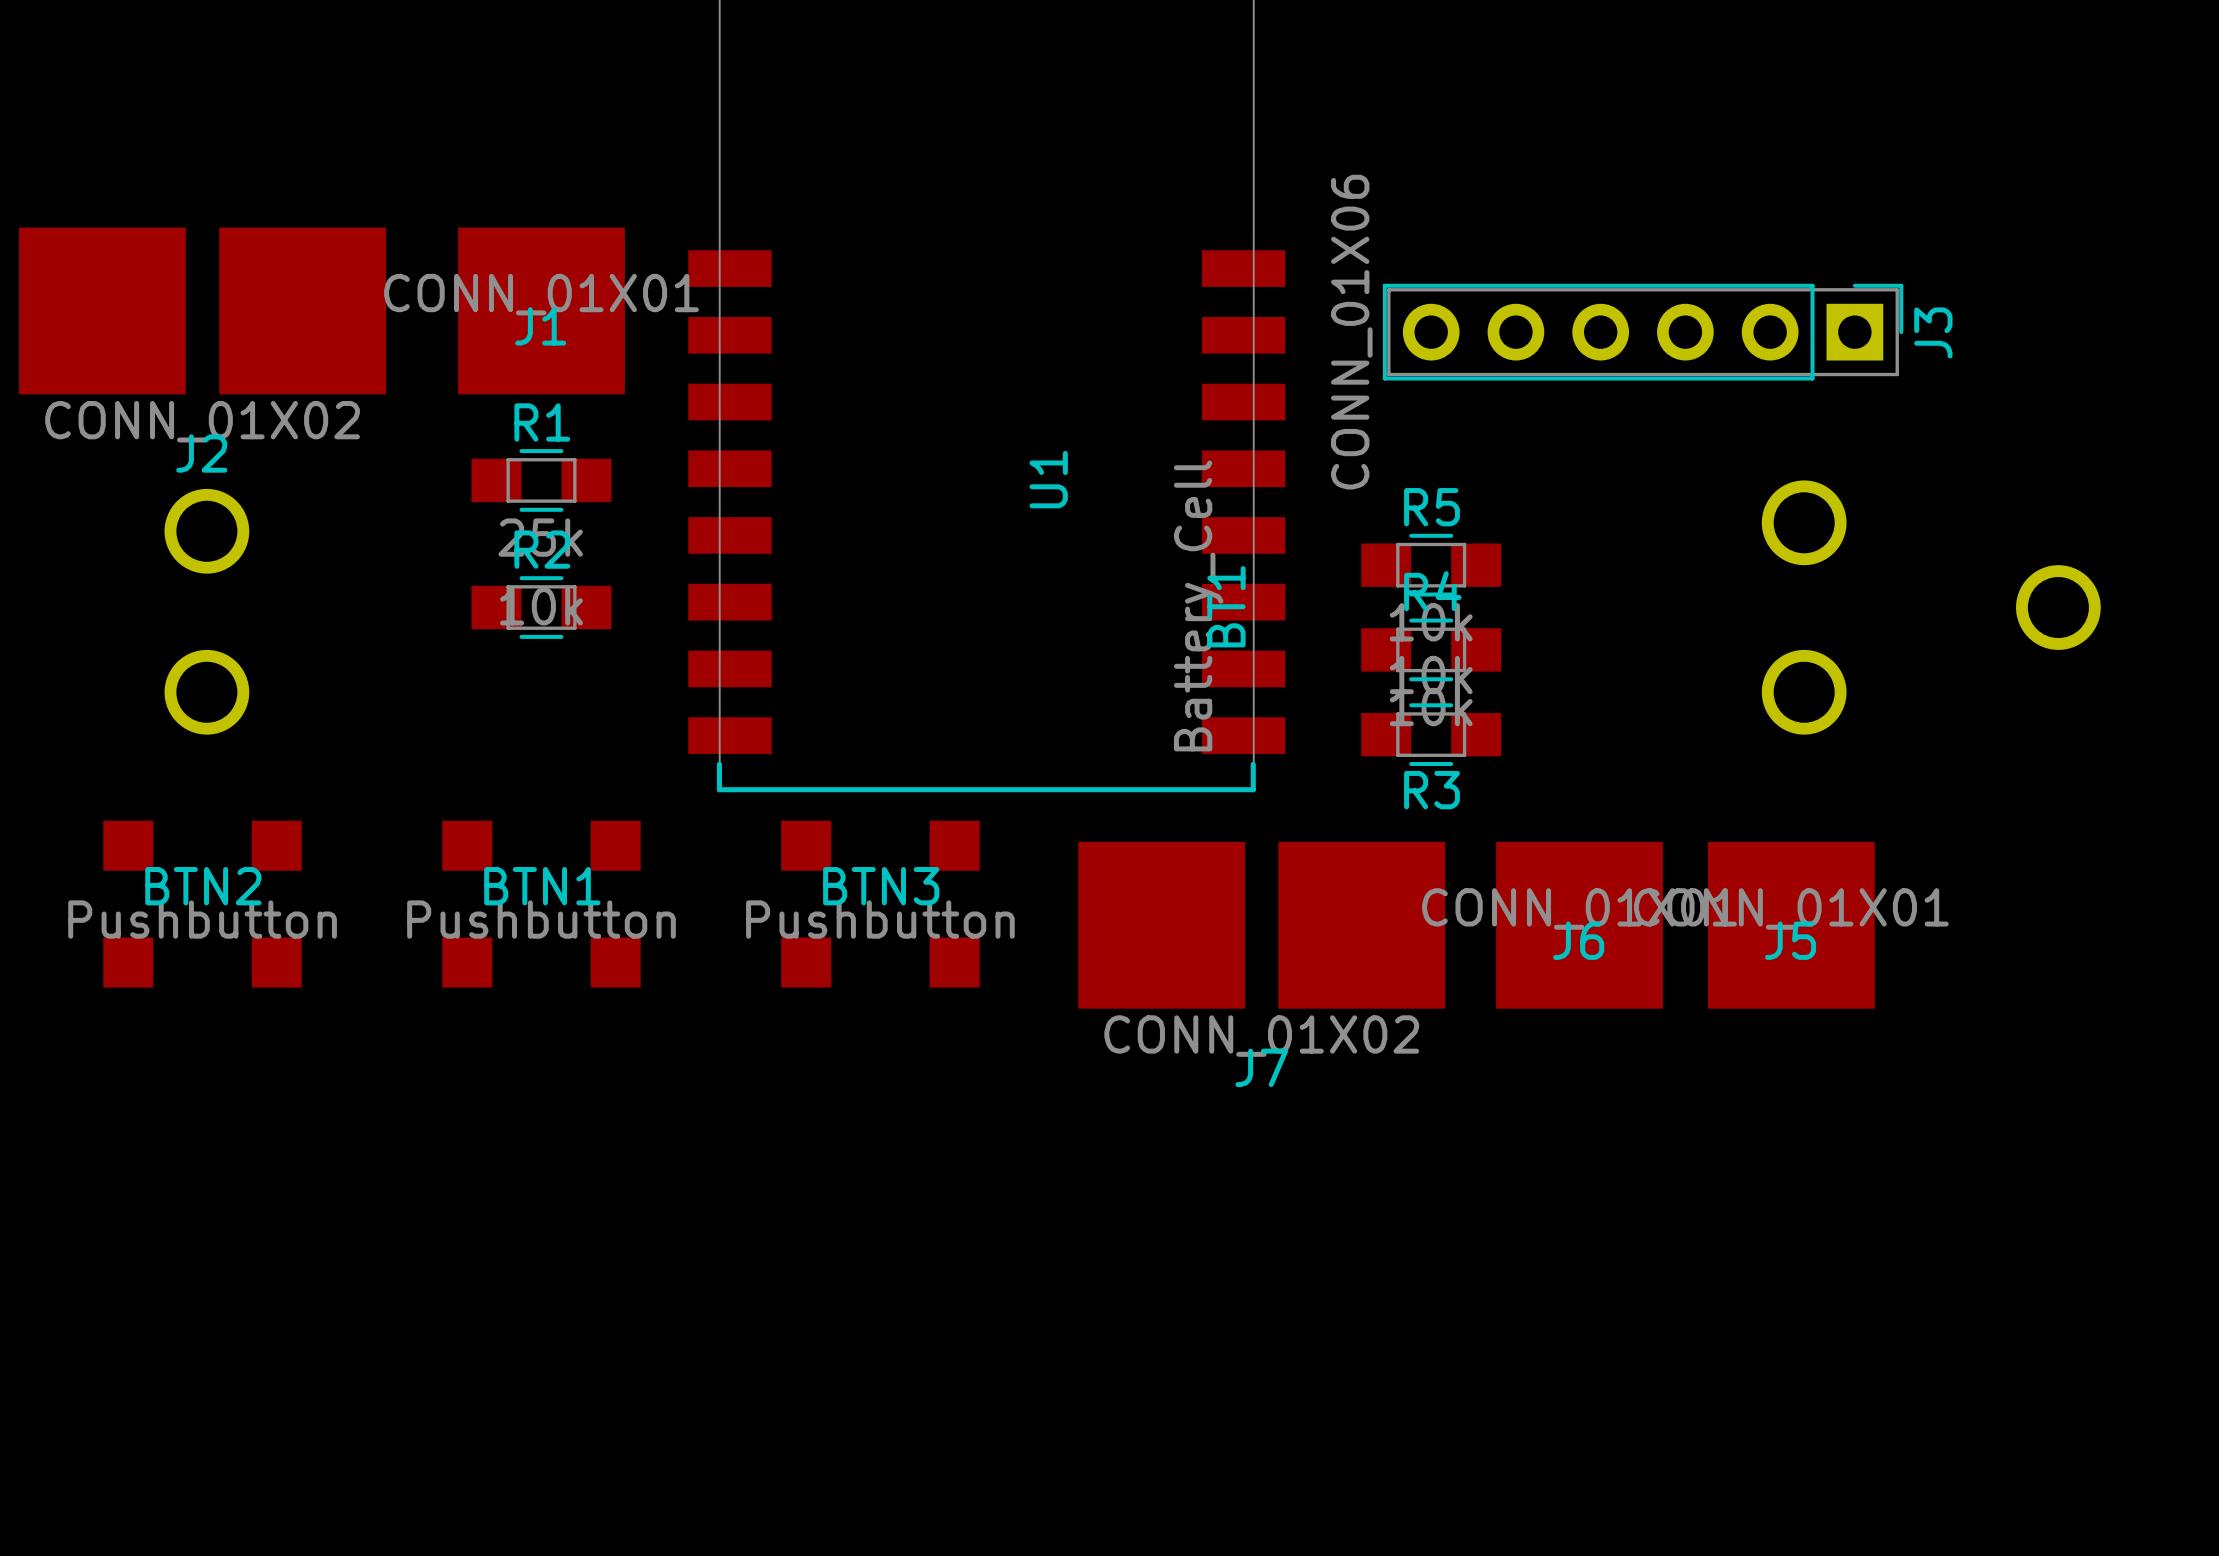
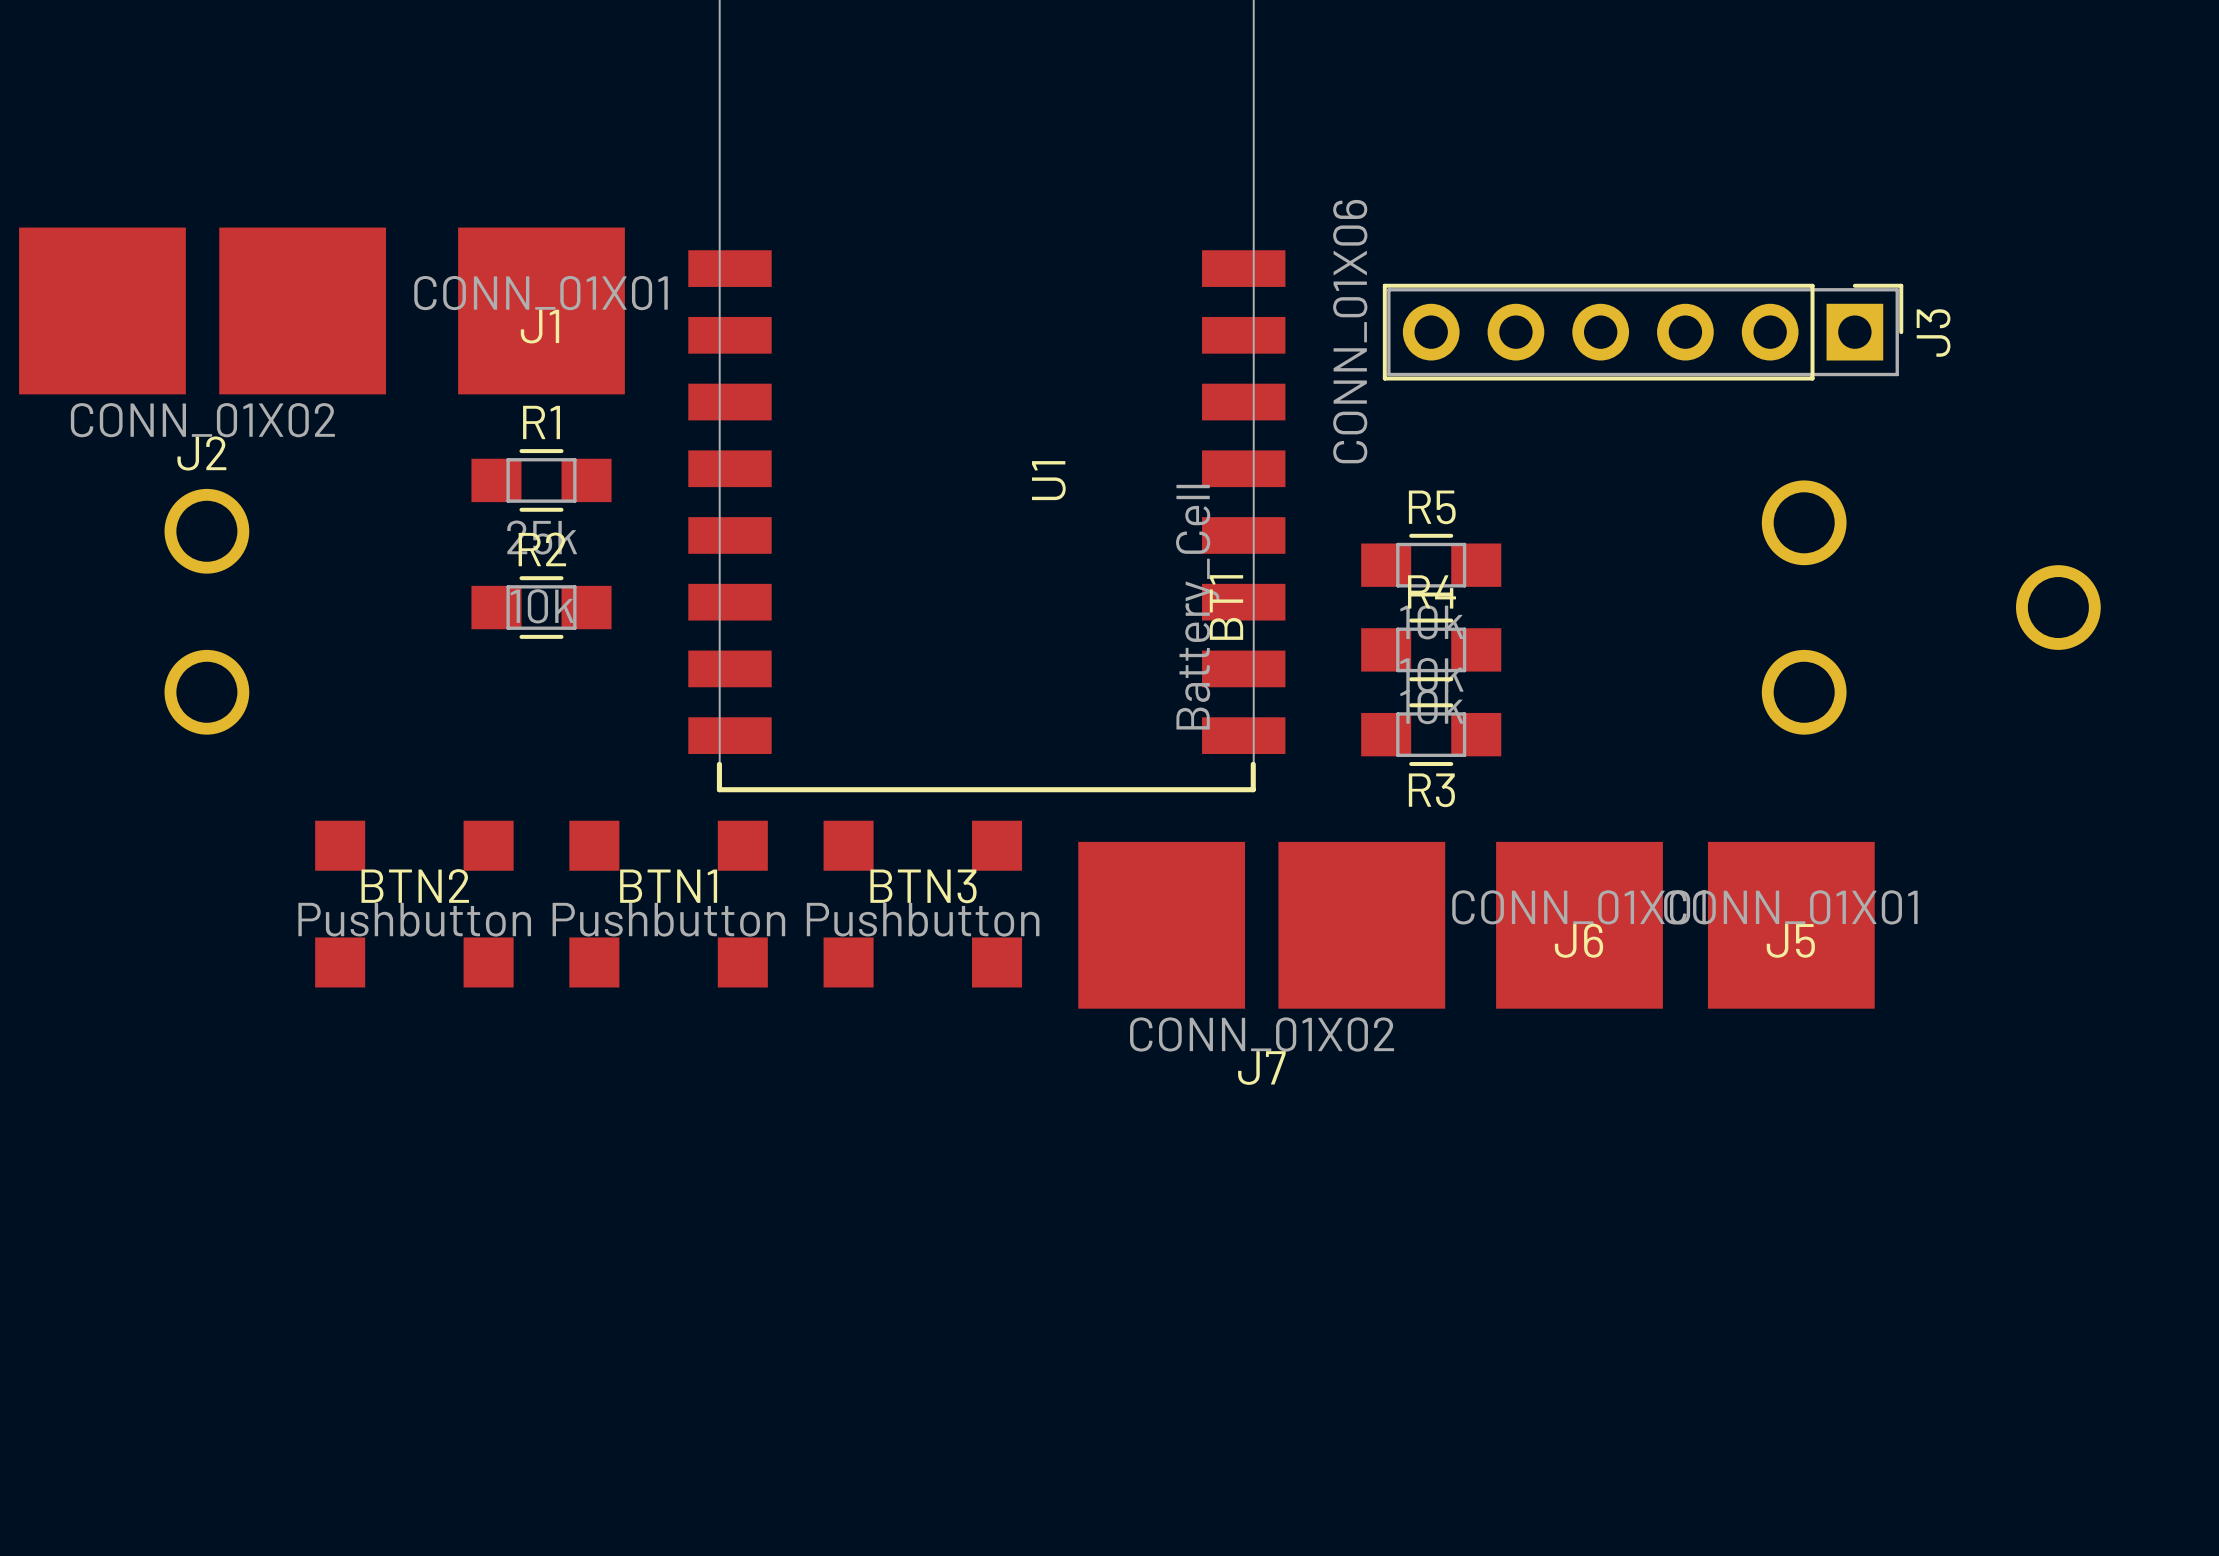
BTN2 position: (202, 904) -> (414, 904)
BTN1 position: (541, 904) -> (668, 904)
BTN3 position: (880, 904) -> (922, 904)

